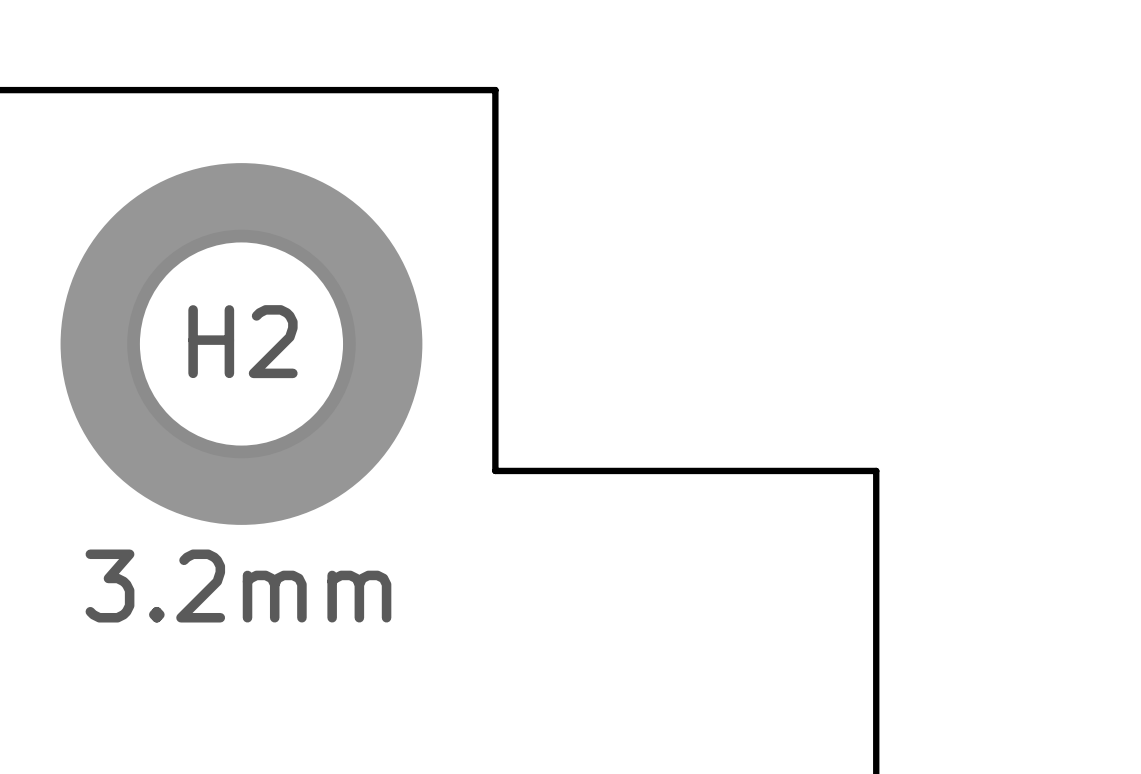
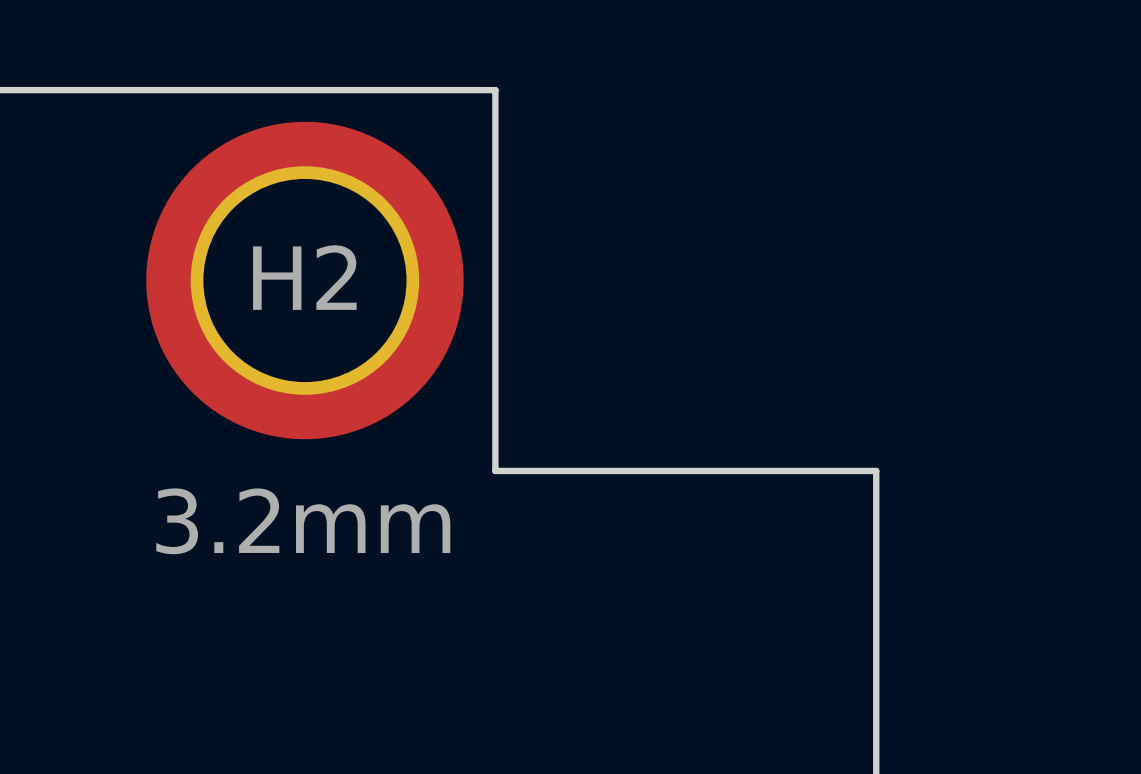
H2 footprint: [60, 163, 423, 525] -> [146, 121, 464, 440]

